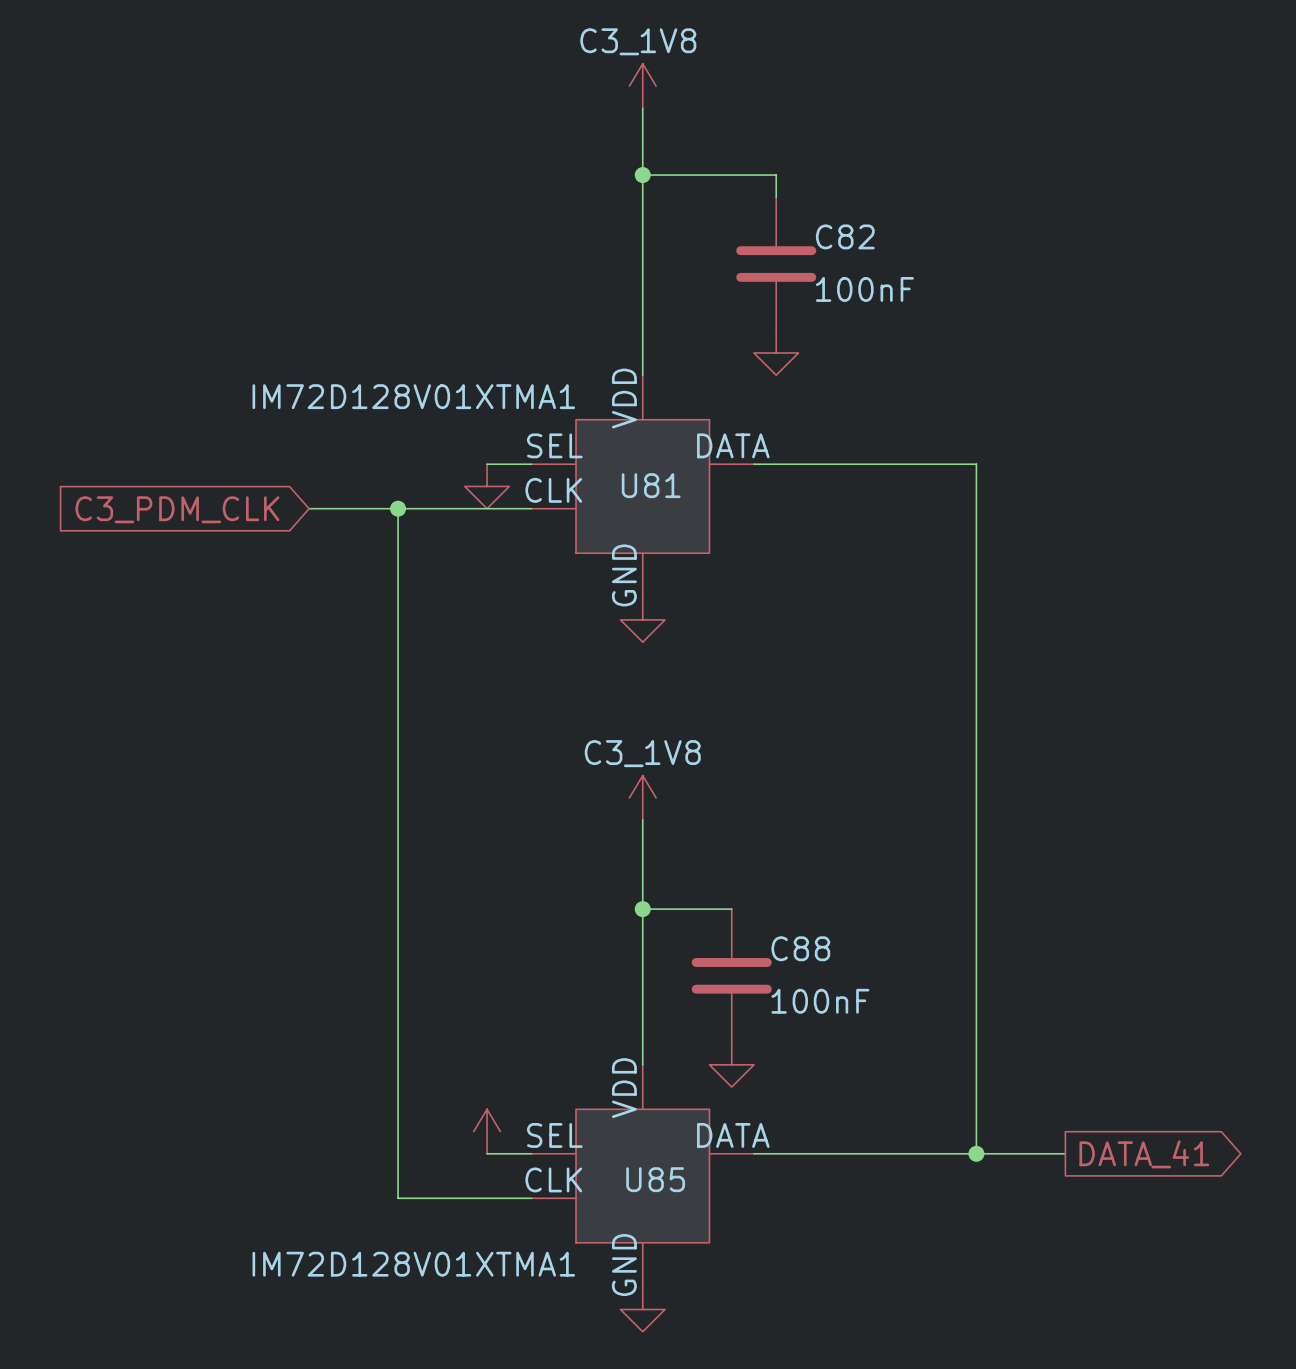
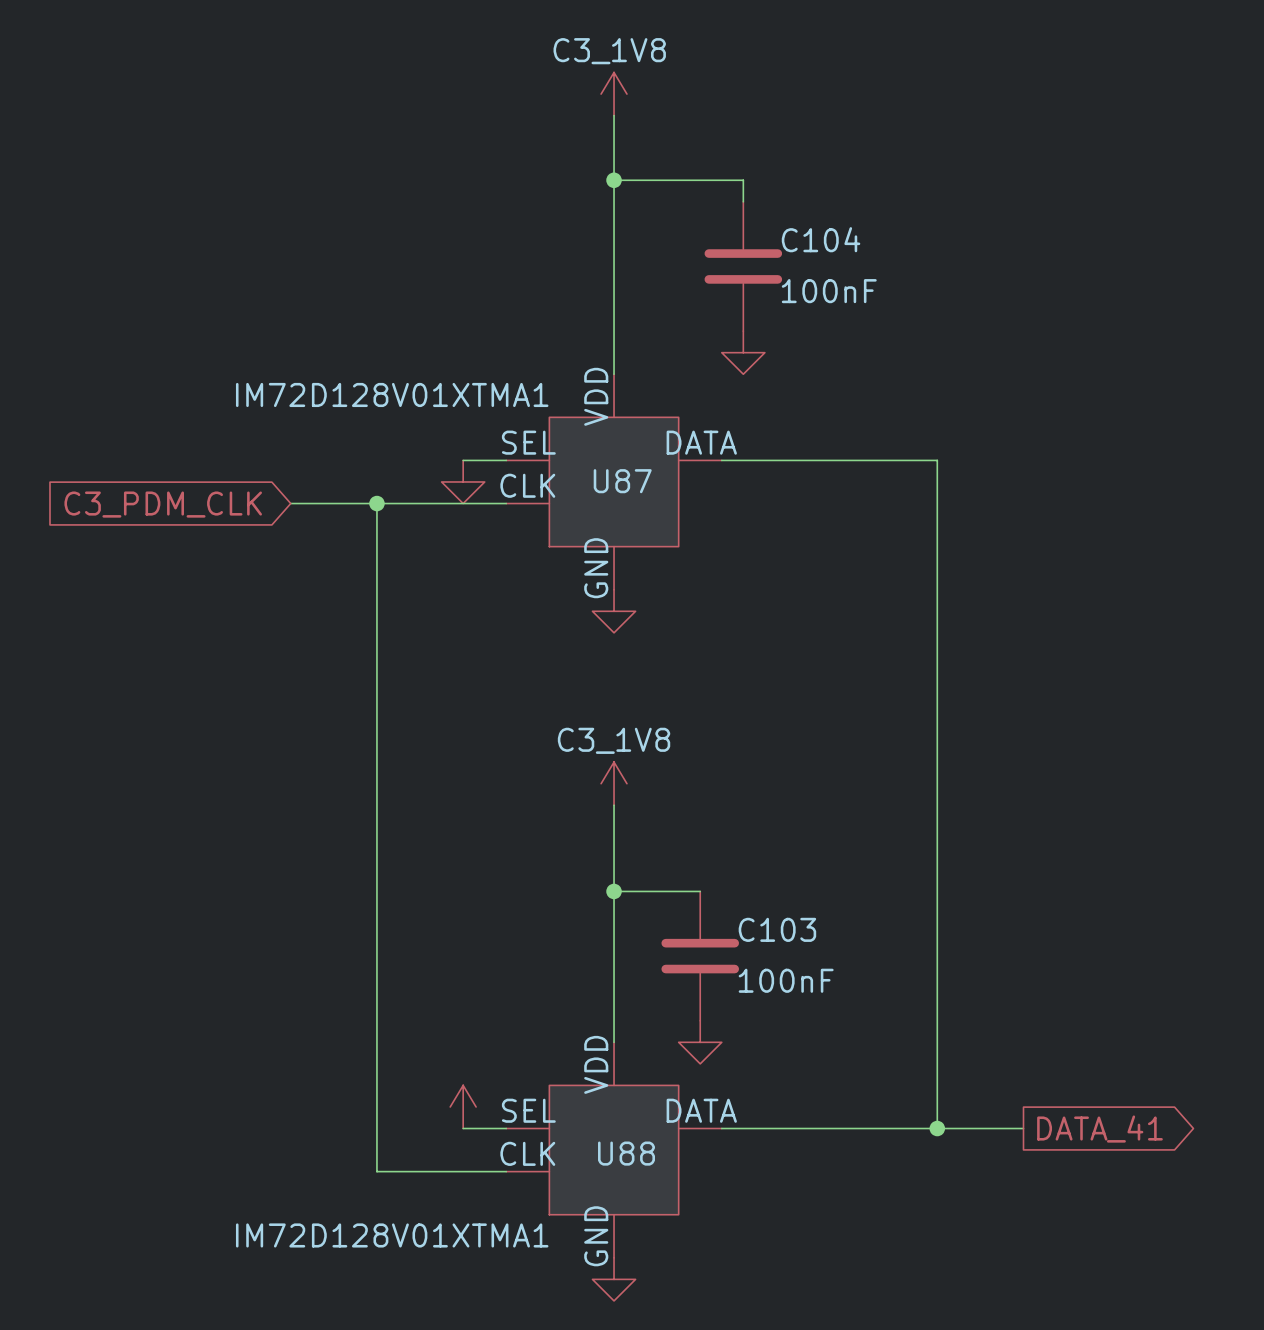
C82 name: C82 (845, 236) -> C104 (821, 239)
U81 name: U81 (651, 485) -> U87 (622, 481)
C88 name: C88 (800, 948) -> C103 (777, 929)
U85 name: U85 (655, 1179) -> U88 (626, 1153)

